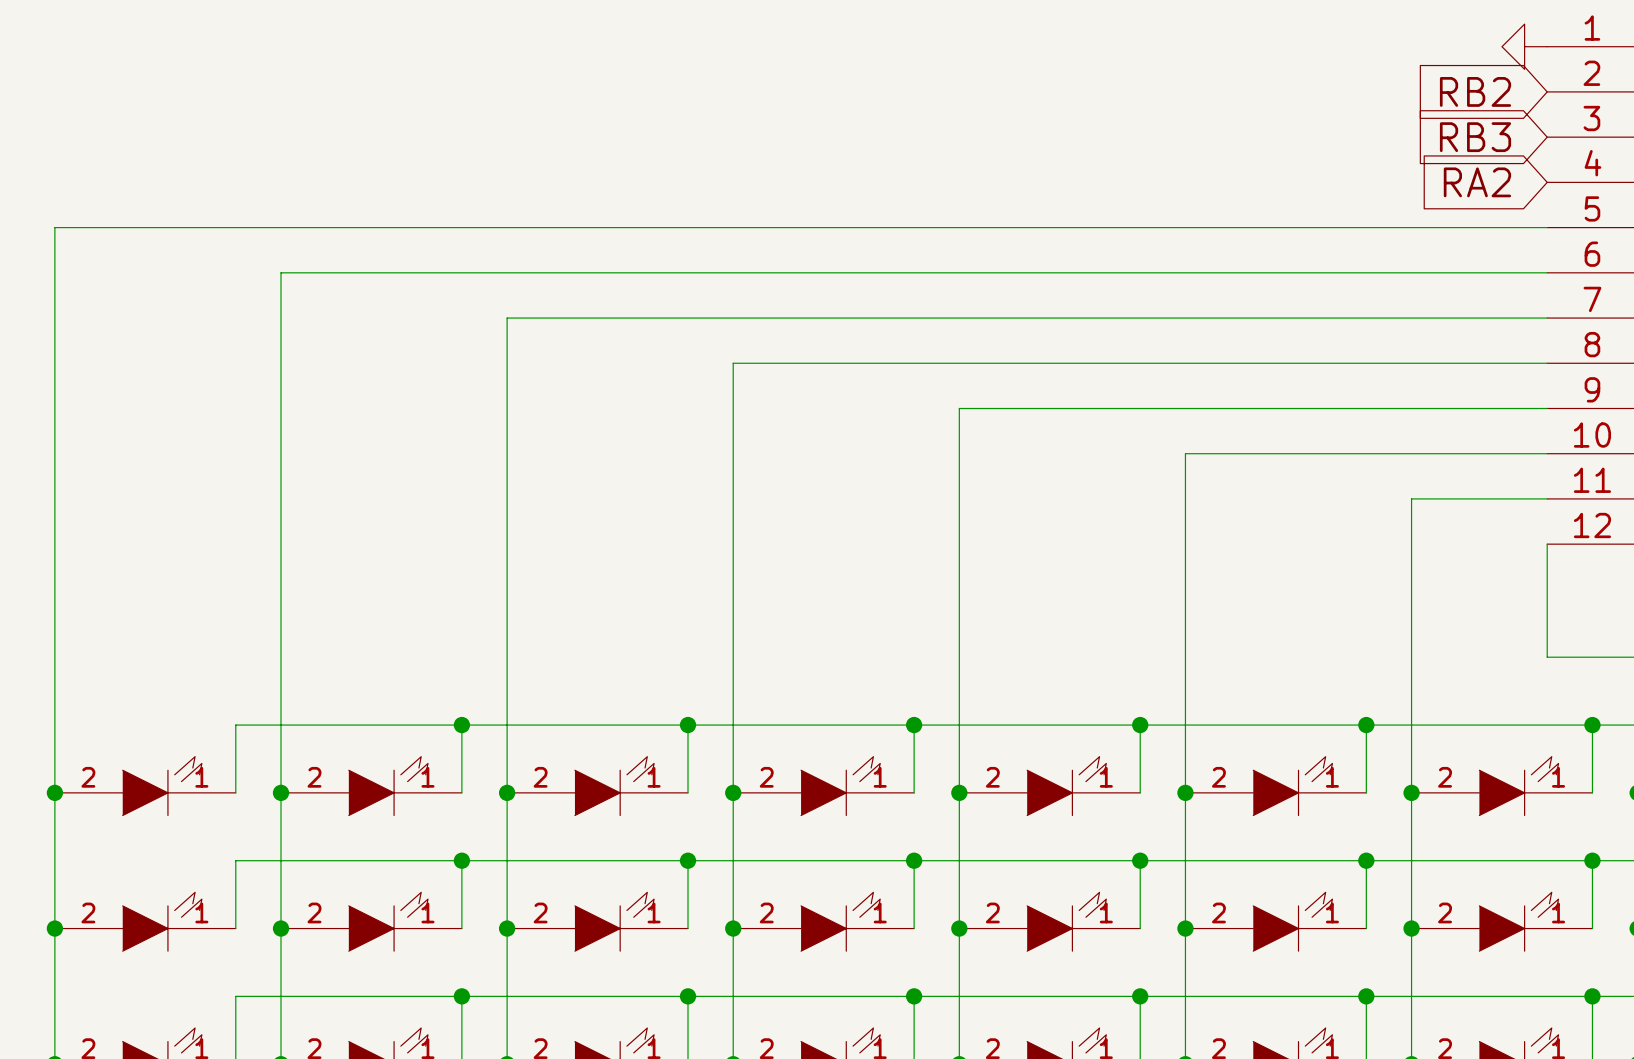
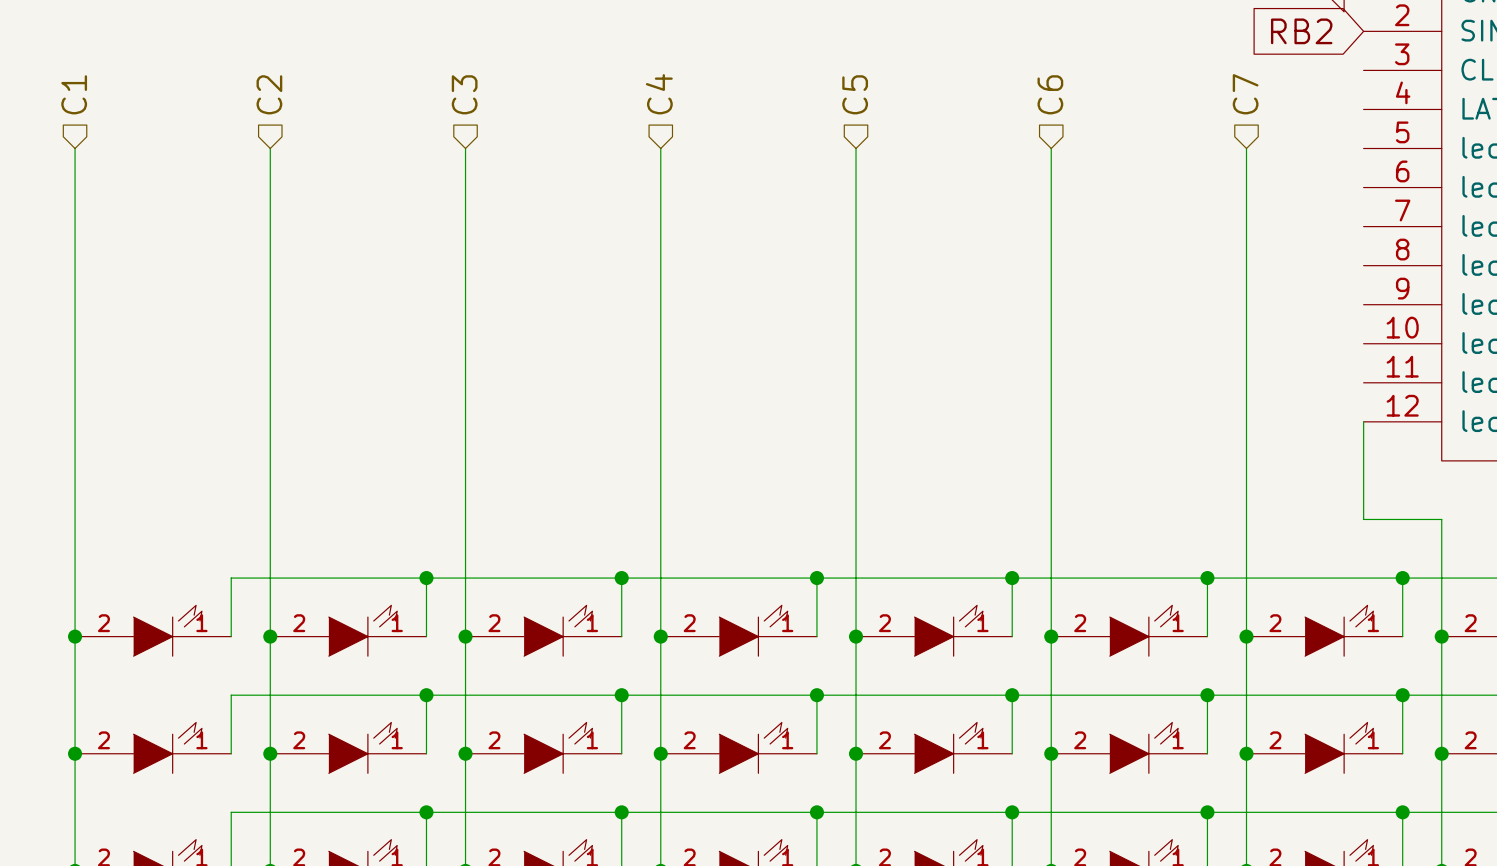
global label: RB3 (1475, 137) -> none
hierarchical label: none -> C4 (659, 94)
hierarchical label: none -> C7 (1245, 94)
hierarchical label: none -> C1 (74, 94)
hierarchical label: none -> C2 (269, 94)
hierarchical label: none -> C3 (464, 94)
hierarchical label: none -> C5 (855, 94)
hierarchical label: none -> C6 (1050, 94)
global label: RA2 (1477, 182) -> none
wire: (54, 227) (1547, 227) -> none
wire: (281, 272) (1547, 272) -> (270, 187) (270, 148)
wire: (507, 318) (1547, 318) -> (465, 226) (465, 148)
wire: (733, 363) (1547, 363) -> (660, 265) (660, 148)
wire: (959, 408) (1547, 408) -> (856, 304) (856, 148)
wire: (1185, 453) (1547, 453) -> (1051, 343) (1051, 148)
wire: (1411, 498) (1547, 498) -> (1246, 382) (1246, 148)

